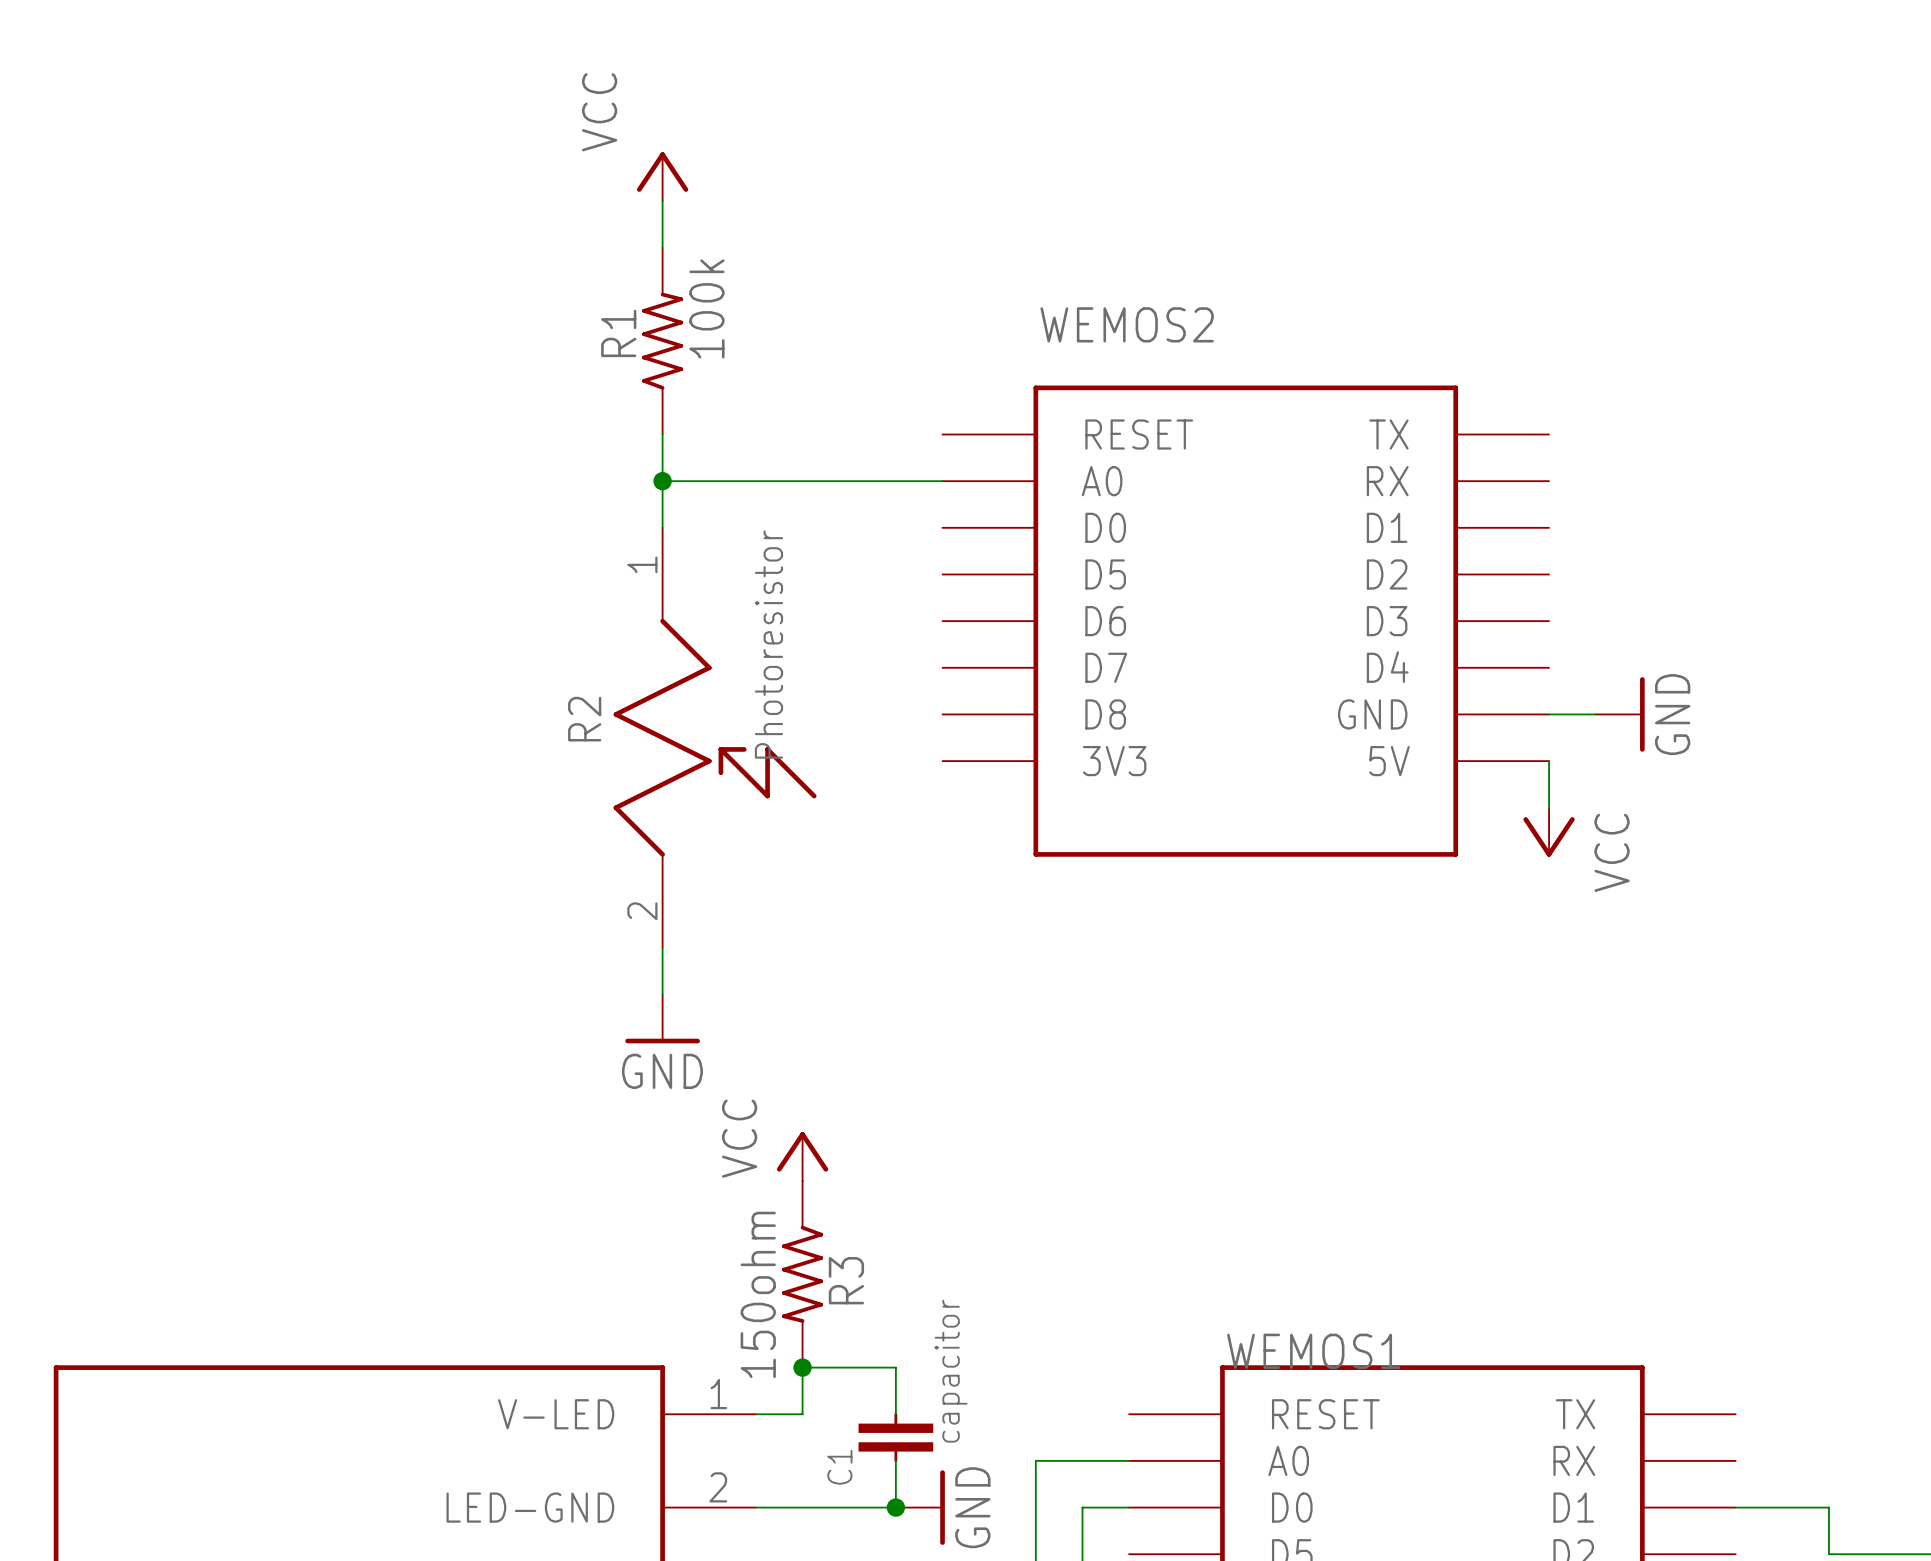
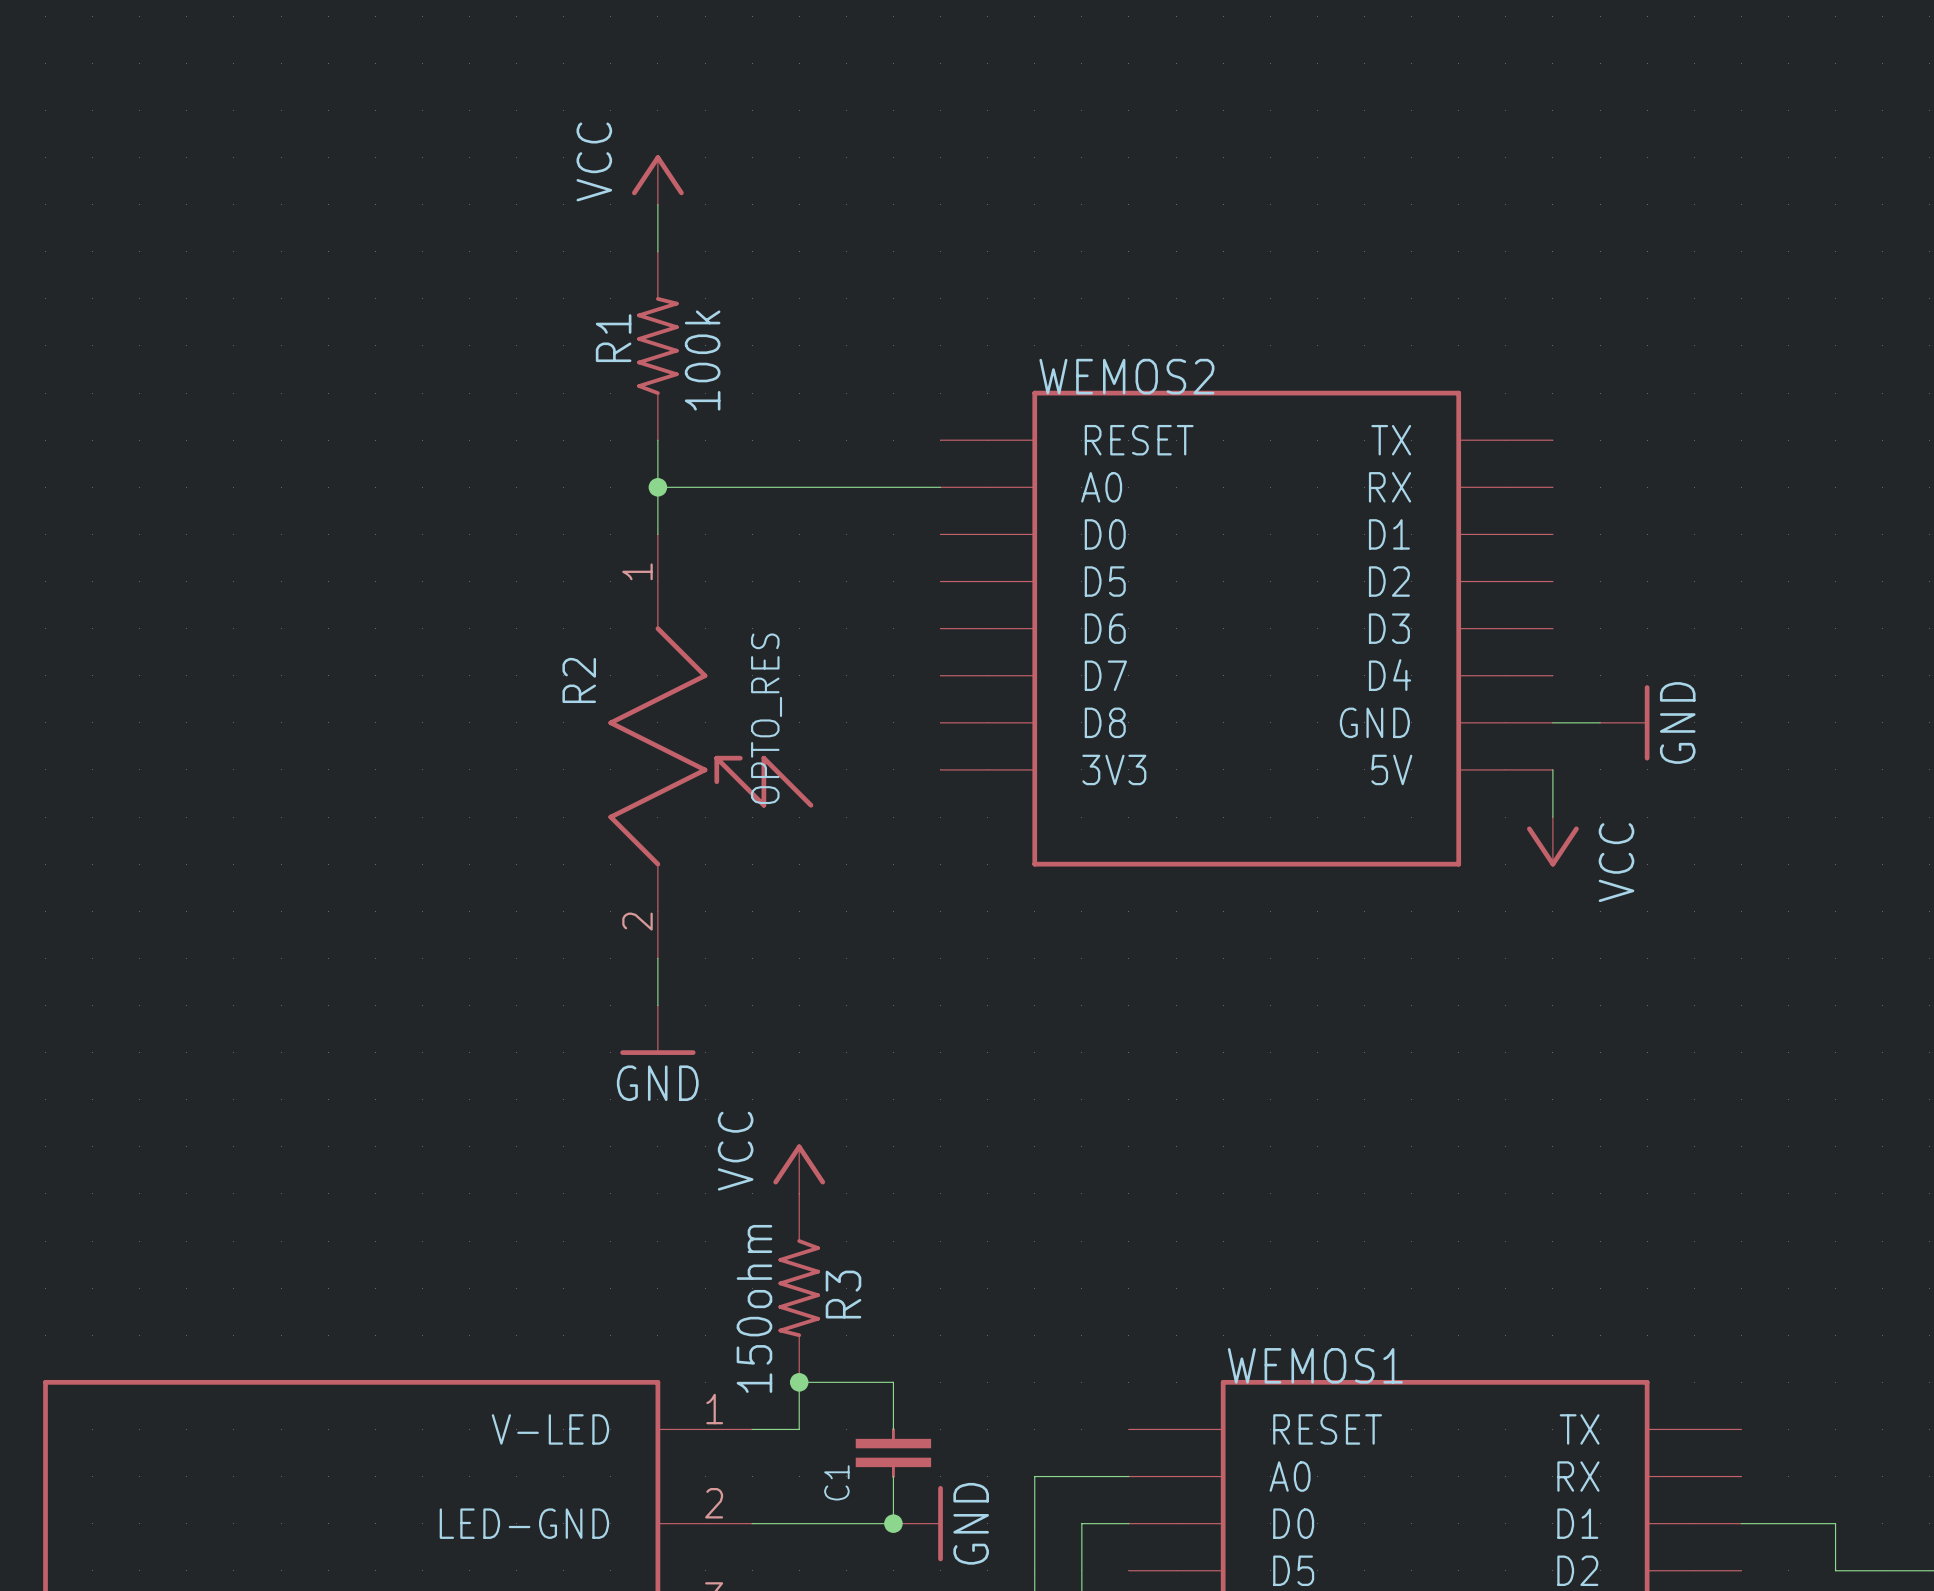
power symbol text position: VCC (599, 112) -> VCC (594, 161)
R1 value position: 100k (706, 308) -> 100k (702, 360)
WEMOS2 name position: WEMOS2 (1127, 324) -> WEMOS2 (1126, 376)
R2 value: Photoresistor (768, 644) -> OPTO_RES (766, 718)
R2 name position: R2 (584, 719) -> R2 (579, 680)
C1 value: capacitor (951, 1371) -> none

